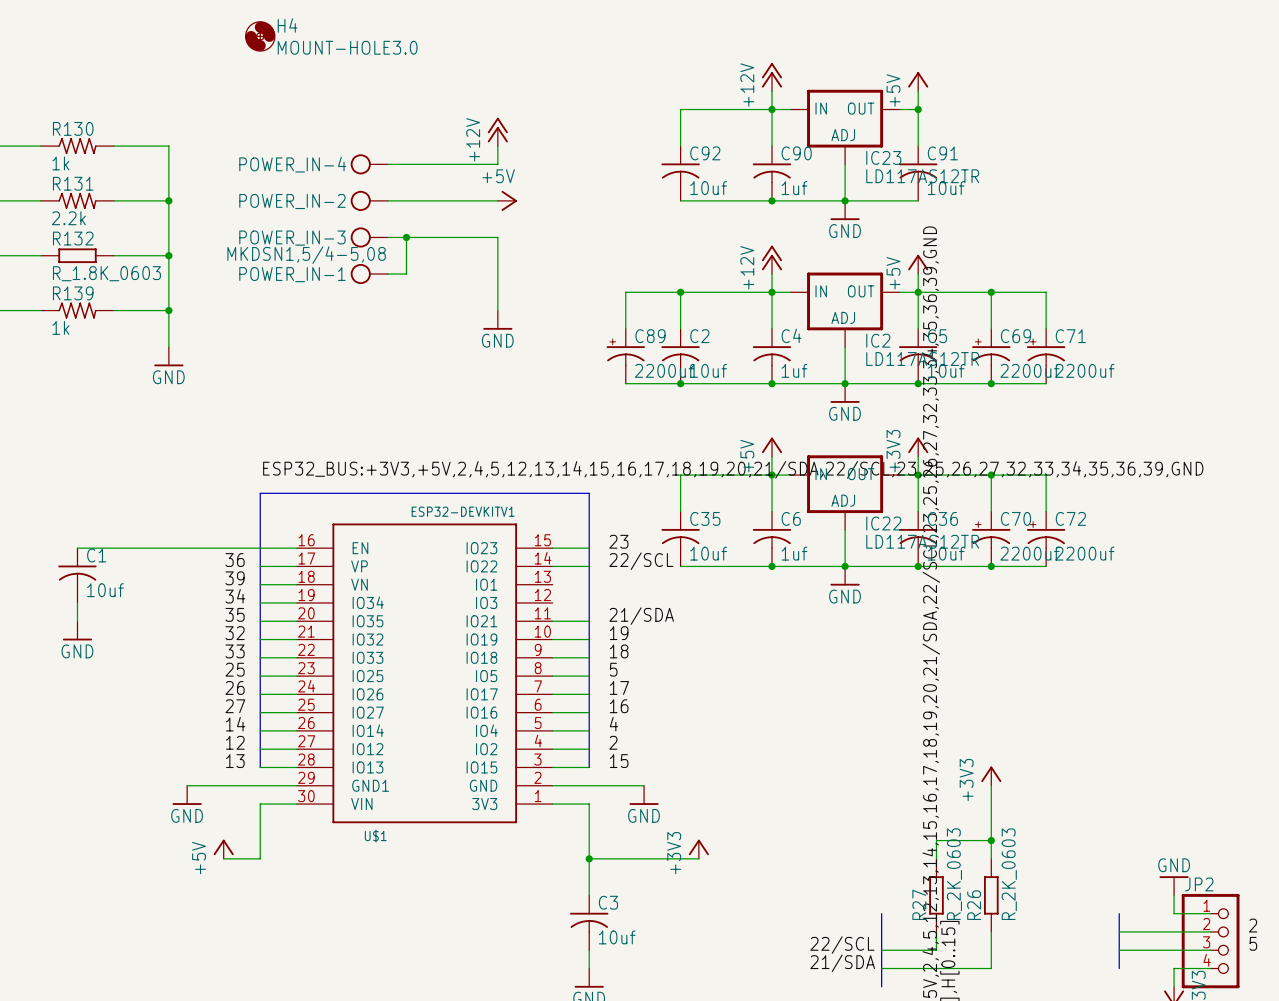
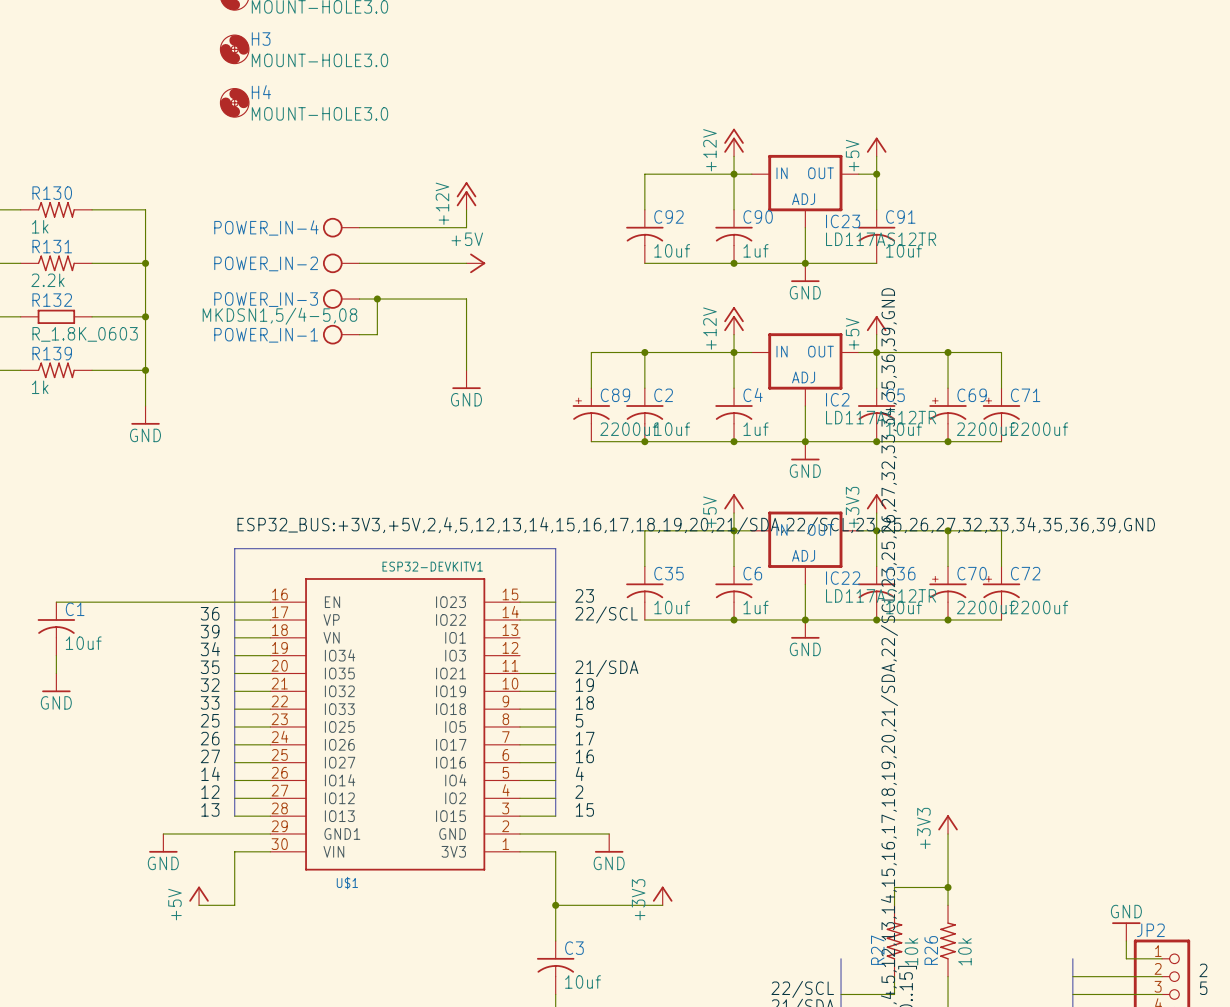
R27 symbol: [929, 858, 944, 932] -> [886, 905, 903, 977]
R26 symbol: [983, 858, 999, 932] -> [940, 905, 956, 977]
R27 value: R_2K_0603 (954, 874) -> 10k (911, 951)
R26 value: R_2K_0603 (1009, 874) -> 10k (964, 951)

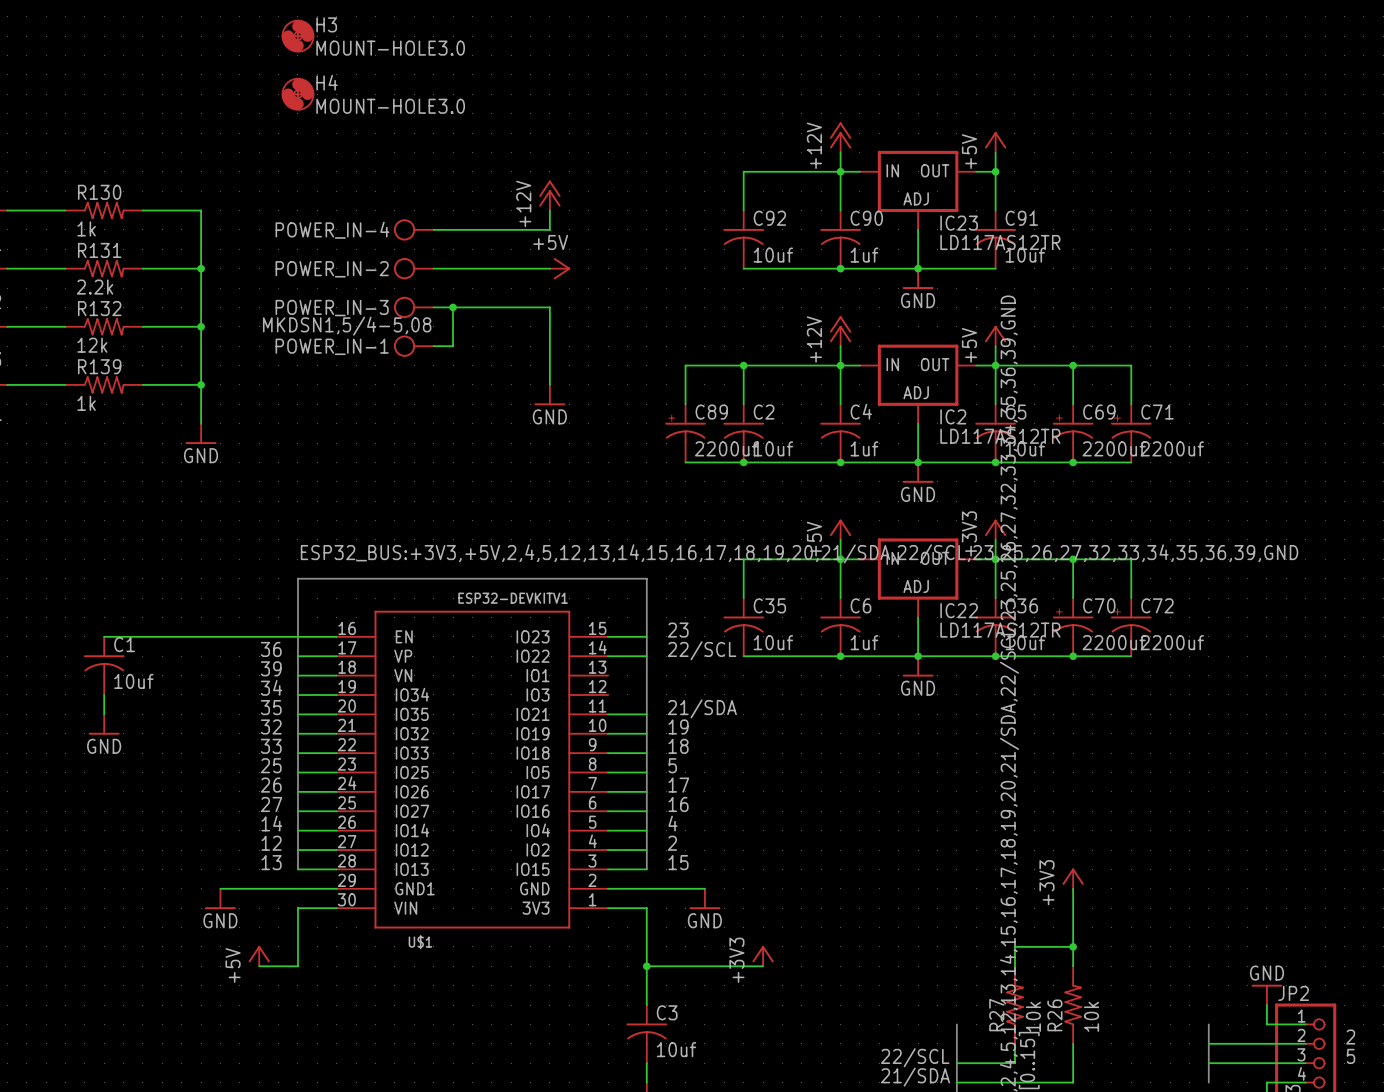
R132 symbol: [20, 309, 93, 324] -> [65, 318, 143, 336]
R132 value: R_1.8K_0603 (85, 334) -> 12k (92, 345)

